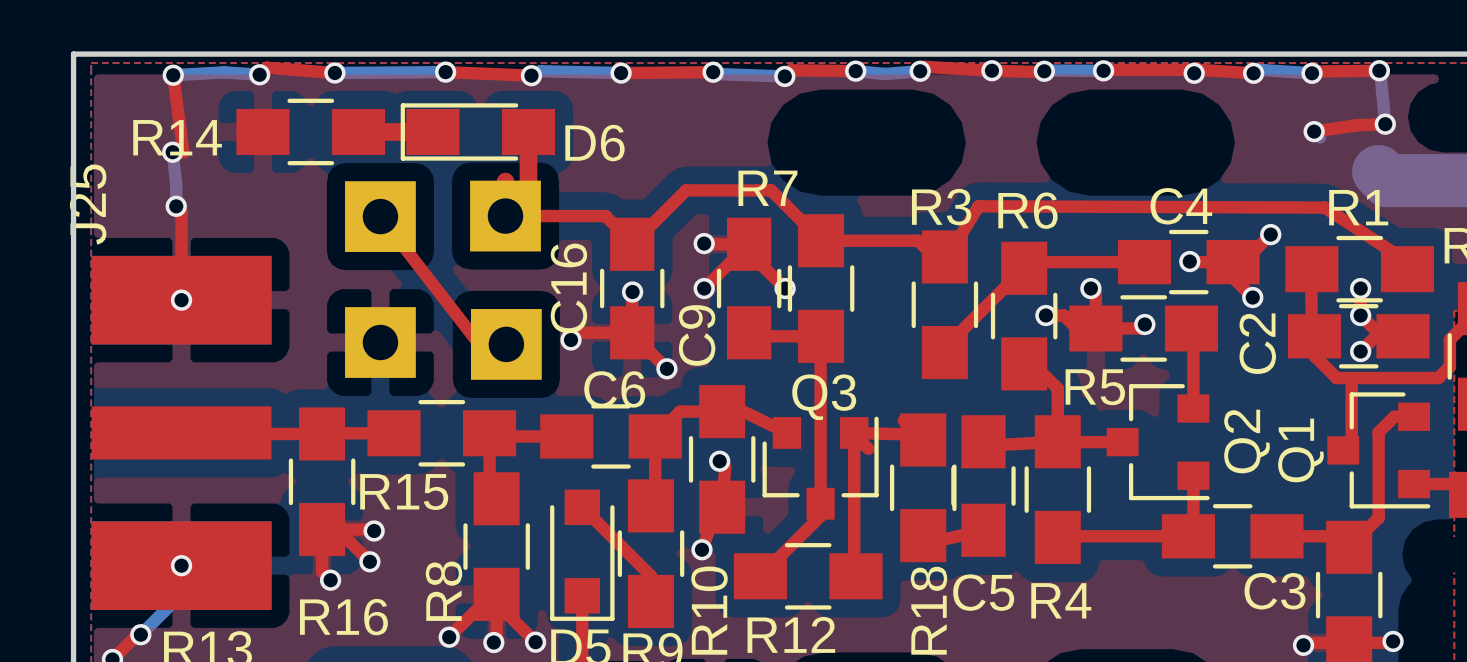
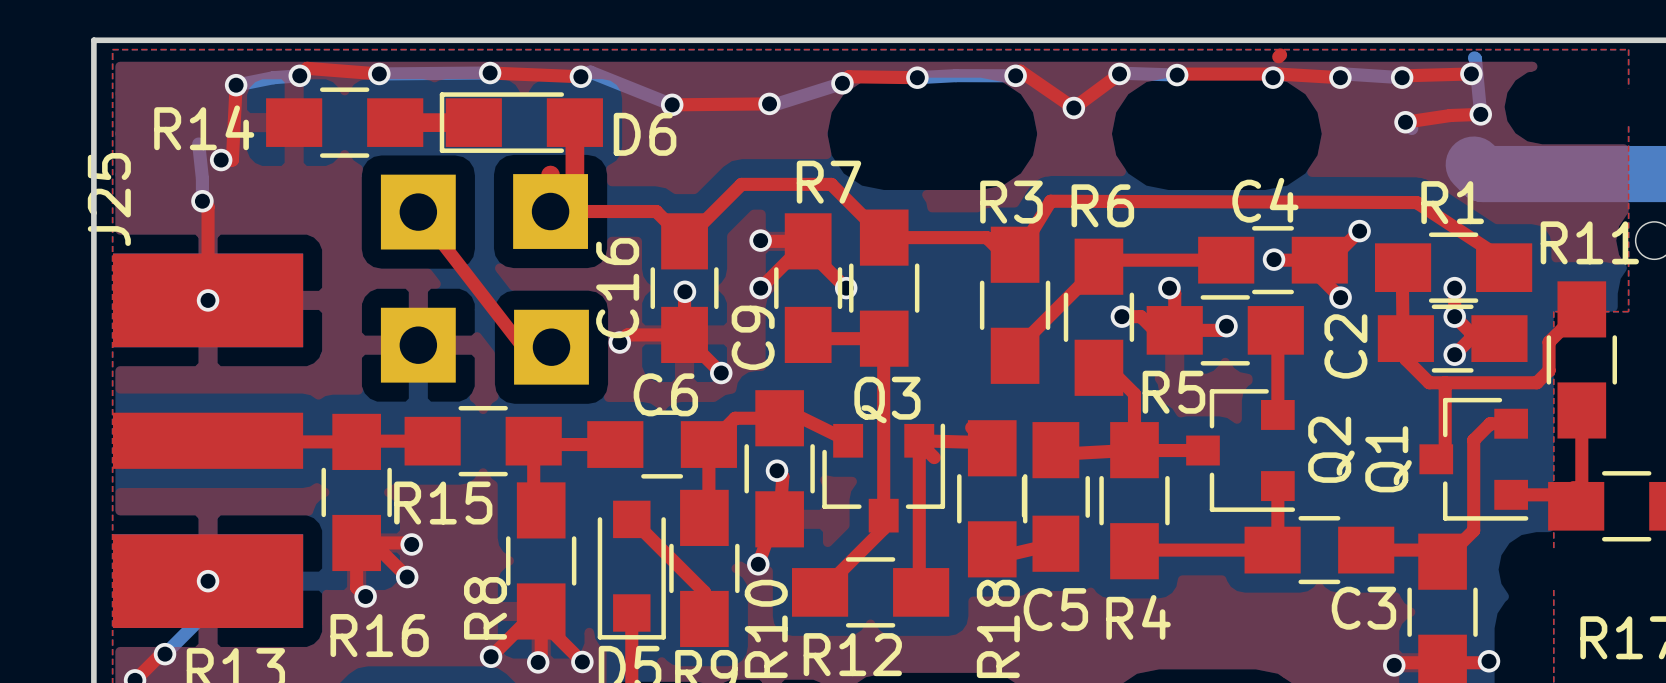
top track: (1199, 69) (1103, 70) -> (1278, 74) (1177, 75)
top track: (1199, 69) (1253, 73) -> none
via: (991, 70) -> none
bottom track: (1103, 70) (1044, 71) -> none
via position: (1103, 70) -> (1177, 75)
top track: (1379, 70) (1313, 71) (1312, 73) -> none
via position: (1379, 70) -> (1471, 73)
top track: (855, 71) (791, 70) (784, 76) -> (917, 77) (849, 76) (842, 83)
bottom track: (855, 71) (884, 73) (920, 71) -> none
via position: (855, 71) -> (917, 77)
top track: (920, 71) (924, 66) (1044, 71) -> none
via: (920, 71) -> none
via position: (1044, 71) -> (1119, 73)
top track: (445, 72) (531, 75) -> (490, 73) (580, 76)
bottom track: (445, 72) (334, 73) -> none
via position: (445, 72) -> (490, 73)
top track: (713, 72) (621, 73) -> (769, 103) (672, 104)
bottom track: (713, 72) (714, 73) (784, 76) -> none
via: (713, 72) -> none
top track: (334, 73) (266, 67) (259, 74) -> (379, 73) (307, 68) (299, 75)
via position: (334, 73) -> (379, 73)
bottom track: (621, 73) (540, 71) (531, 75) -> none
via position: (621, 73) -> (672, 104)
via position: (1194, 73) -> (1272, 77)
bottom track: (1253, 73) (1257, 69) (1312, 73) -> (1340, 77) (1344, 73) (1402, 77)
via position: (1253, 73) -> (1340, 77)
via position: (1312, 73) -> (1402, 77)
bottom track: (259, 74) (224, 72) (173, 75) -> none
via position: (259, 74) -> (299, 75)
top track: (173, 75) (183, 152) (172, 152) -> none
via: (173, 75) -> none
via position: (531, 75) -> (580, 76)
via position: (784, 76) -> (842, 83)
bottom track: none -> (490, 73) (379, 73)
top track: none -> (1119, 73) (1073, 108) (1020, 71) (1015, 75)
bottom track: none -> (1119, 73) (1177, 75)
top track: none -> (1471, 73) (1404, 75) (1402, 77)
top track: none -> (1278, 74) (1340, 77)
bottom track: none -> (299, 75) (273, 77) (236, 85)
bottom track: none -> (1015, 75) (917, 77)
via: none -> (1015, 75)
bottom track: none -> (580, 76) (590, 72) (672, 104)
bottom track: none -> (842, 83) (771, 105) (769, 103)
top track: none -> (236, 85) (232, 160) (221, 160)
via: none -> (236, 85)
via: none -> (769, 103)
via: none -> (1073, 108)
via position: (172, 152) -> (221, 160)

